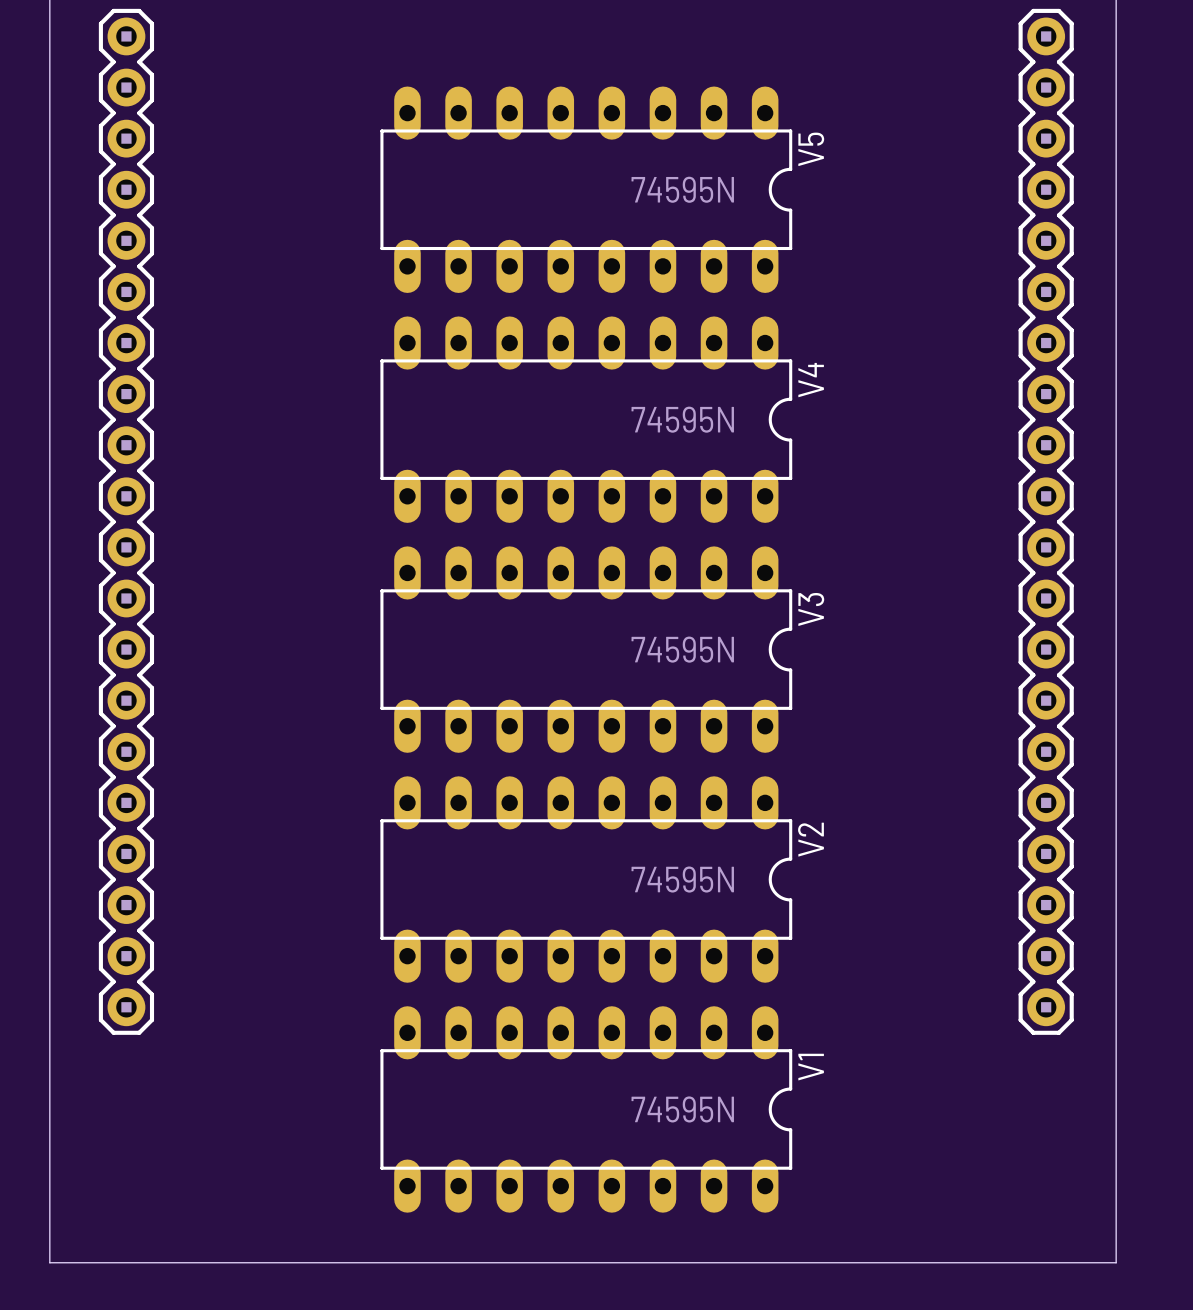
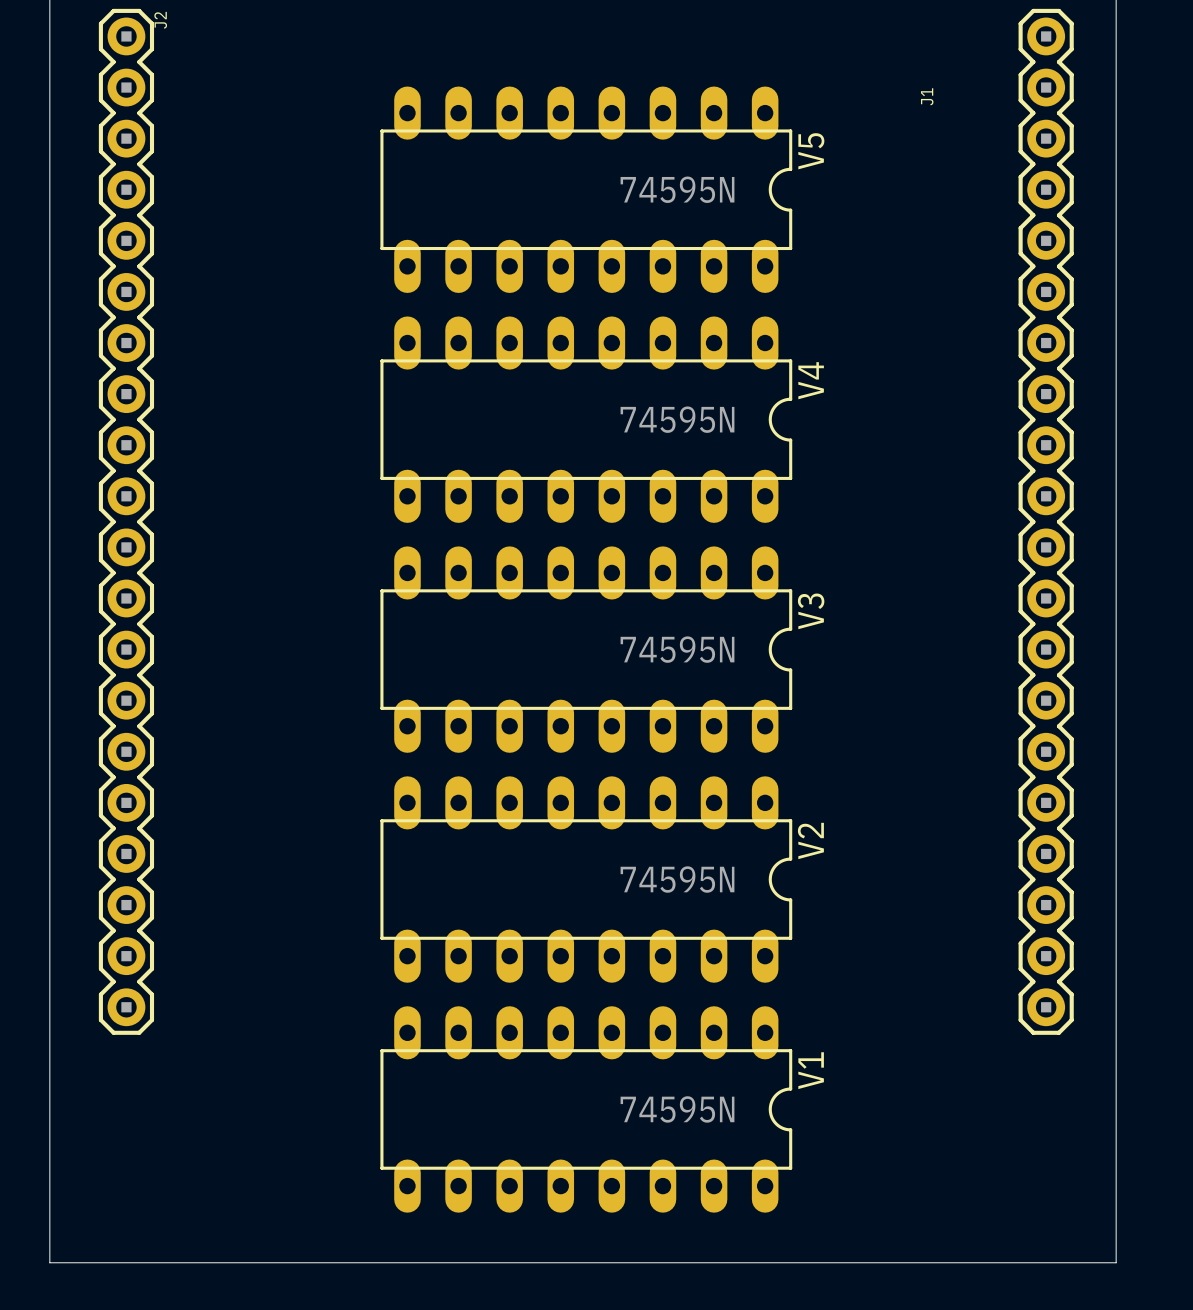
J2 name: none -> J2 (160, 20)
J1 name: none -> J1 (927, 96)

